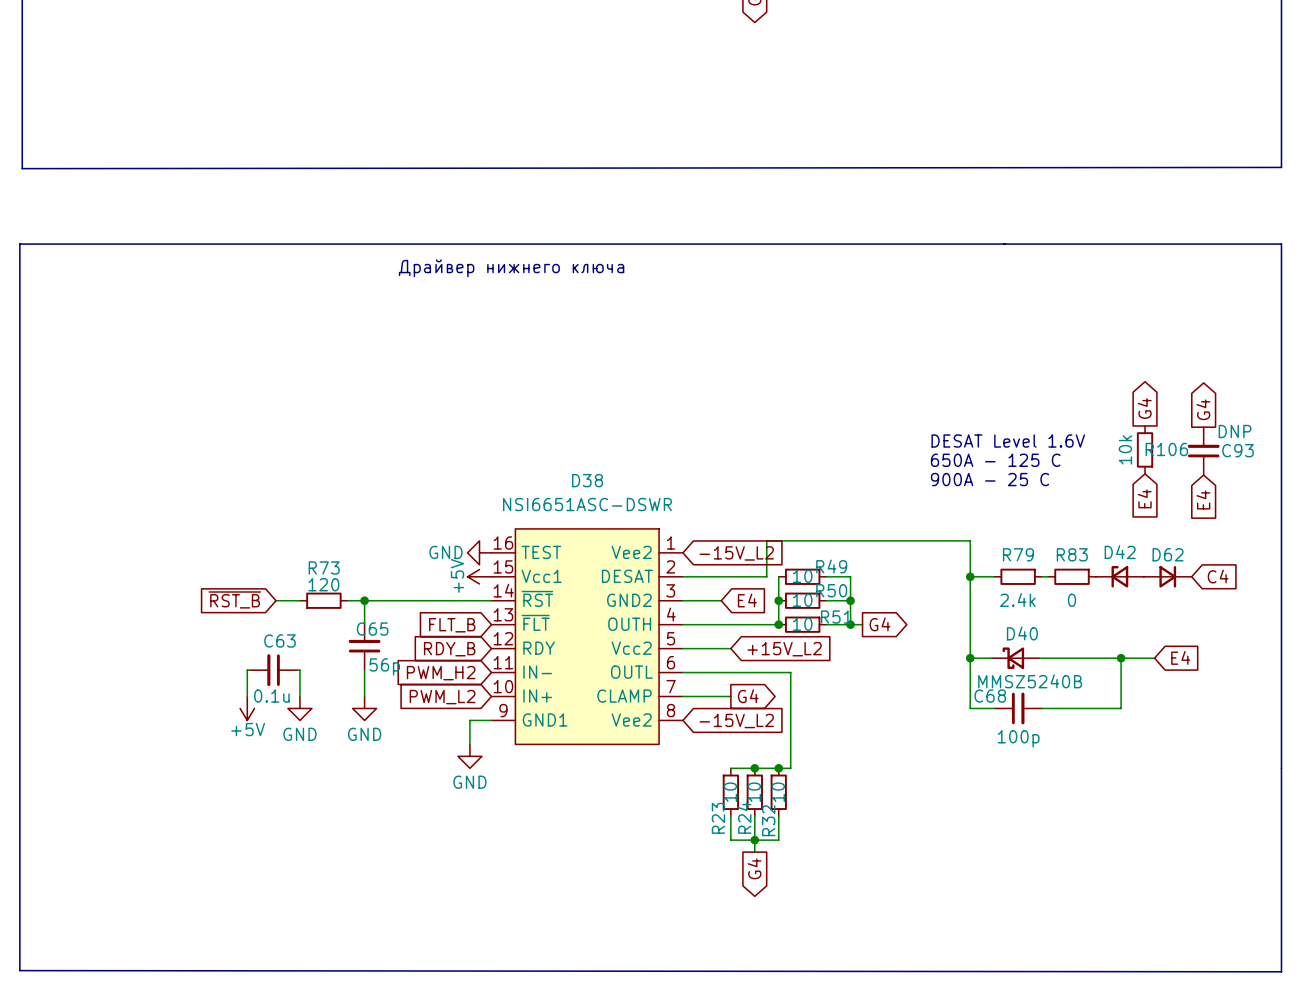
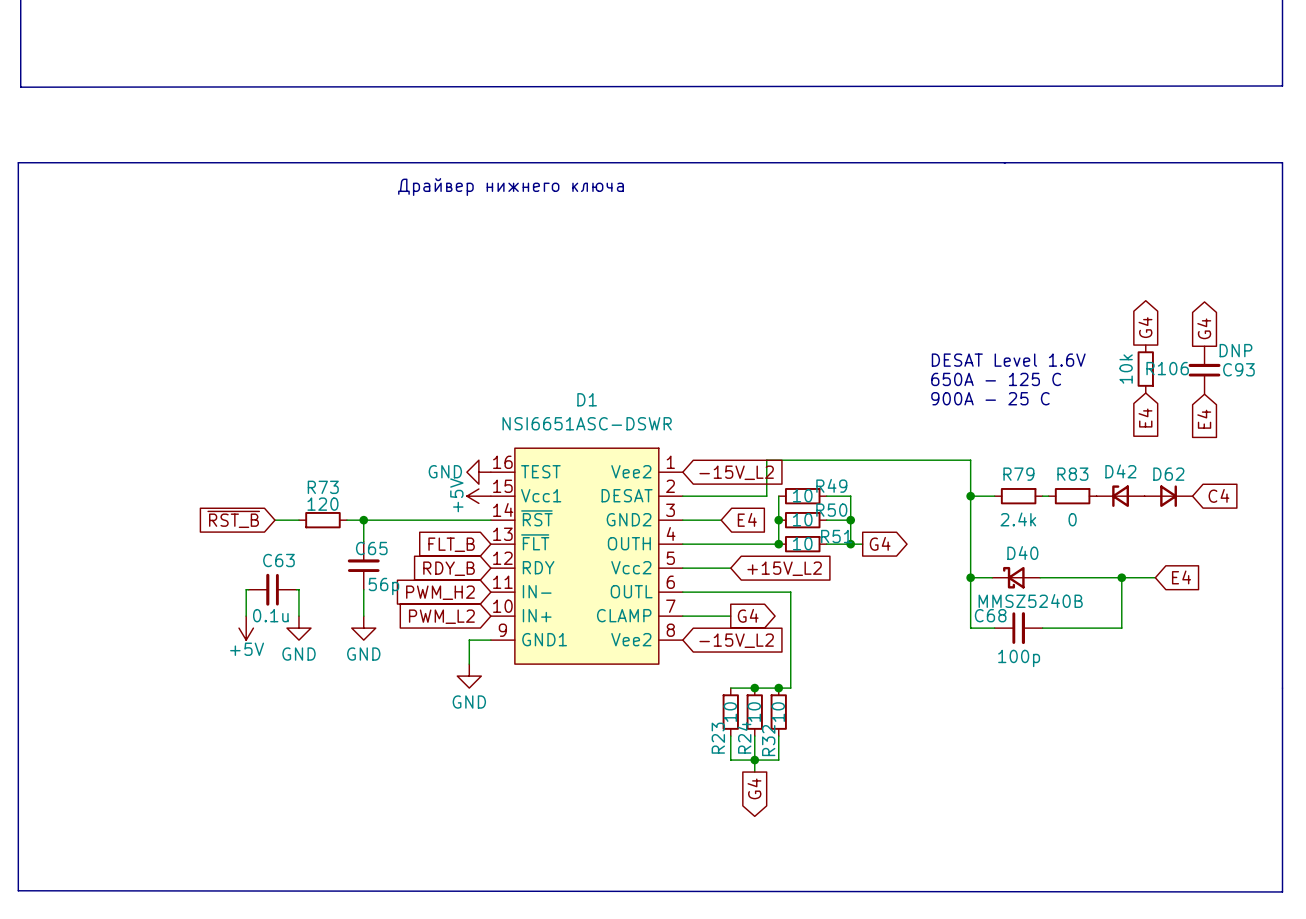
D38 name: D38 (587, 480) -> D1 (587, 399)

